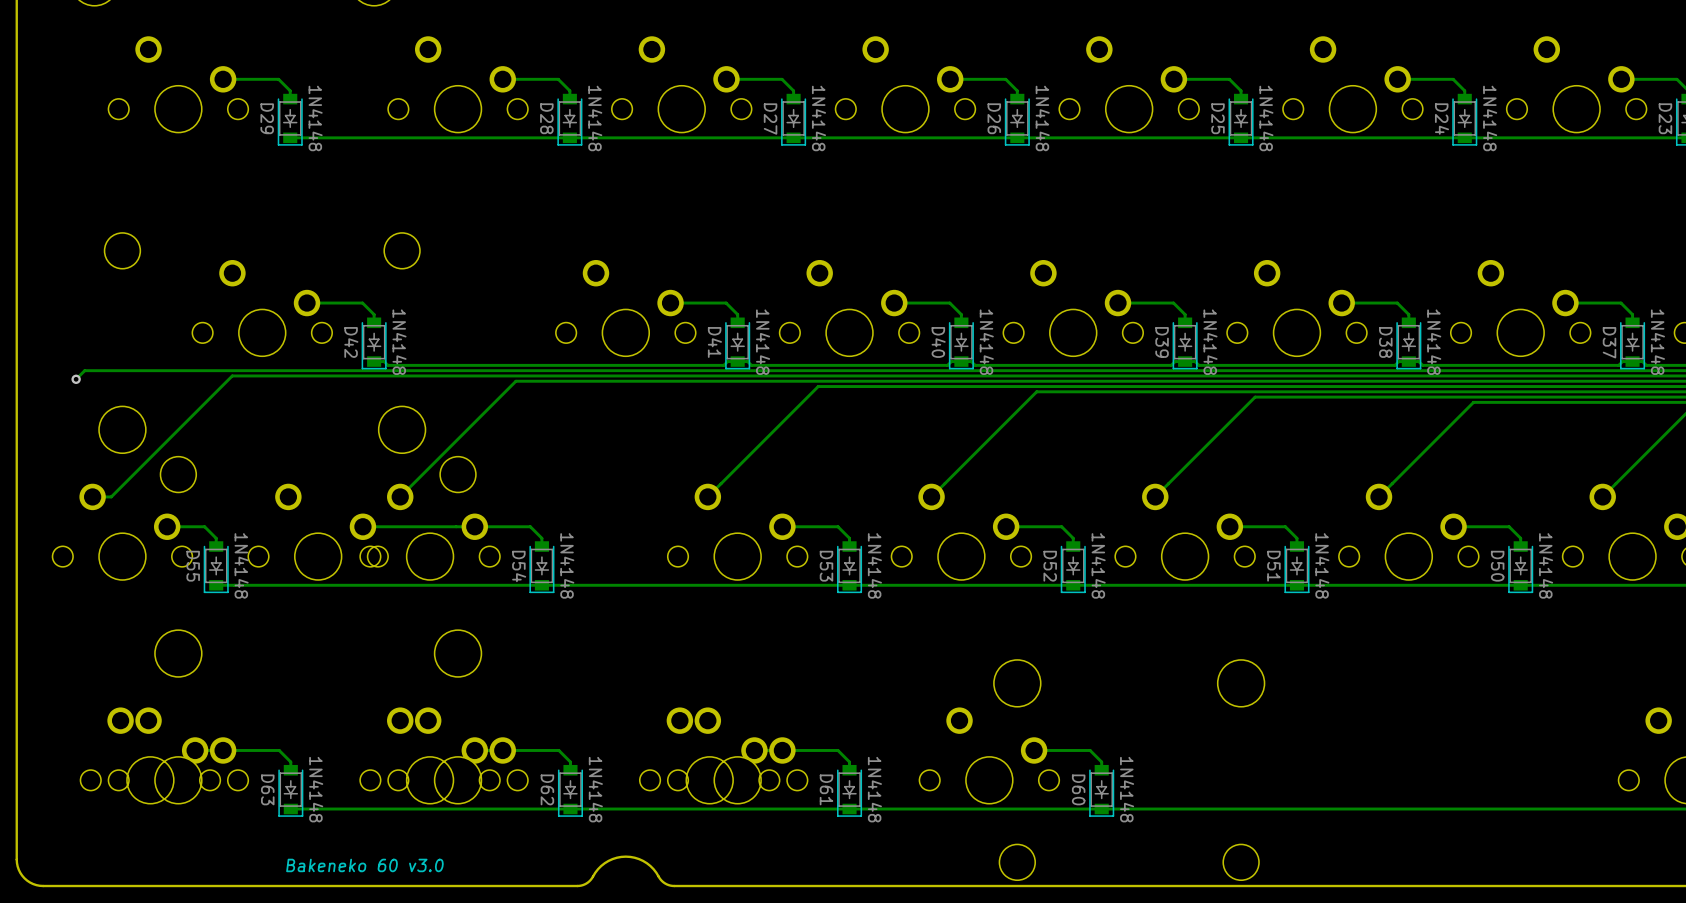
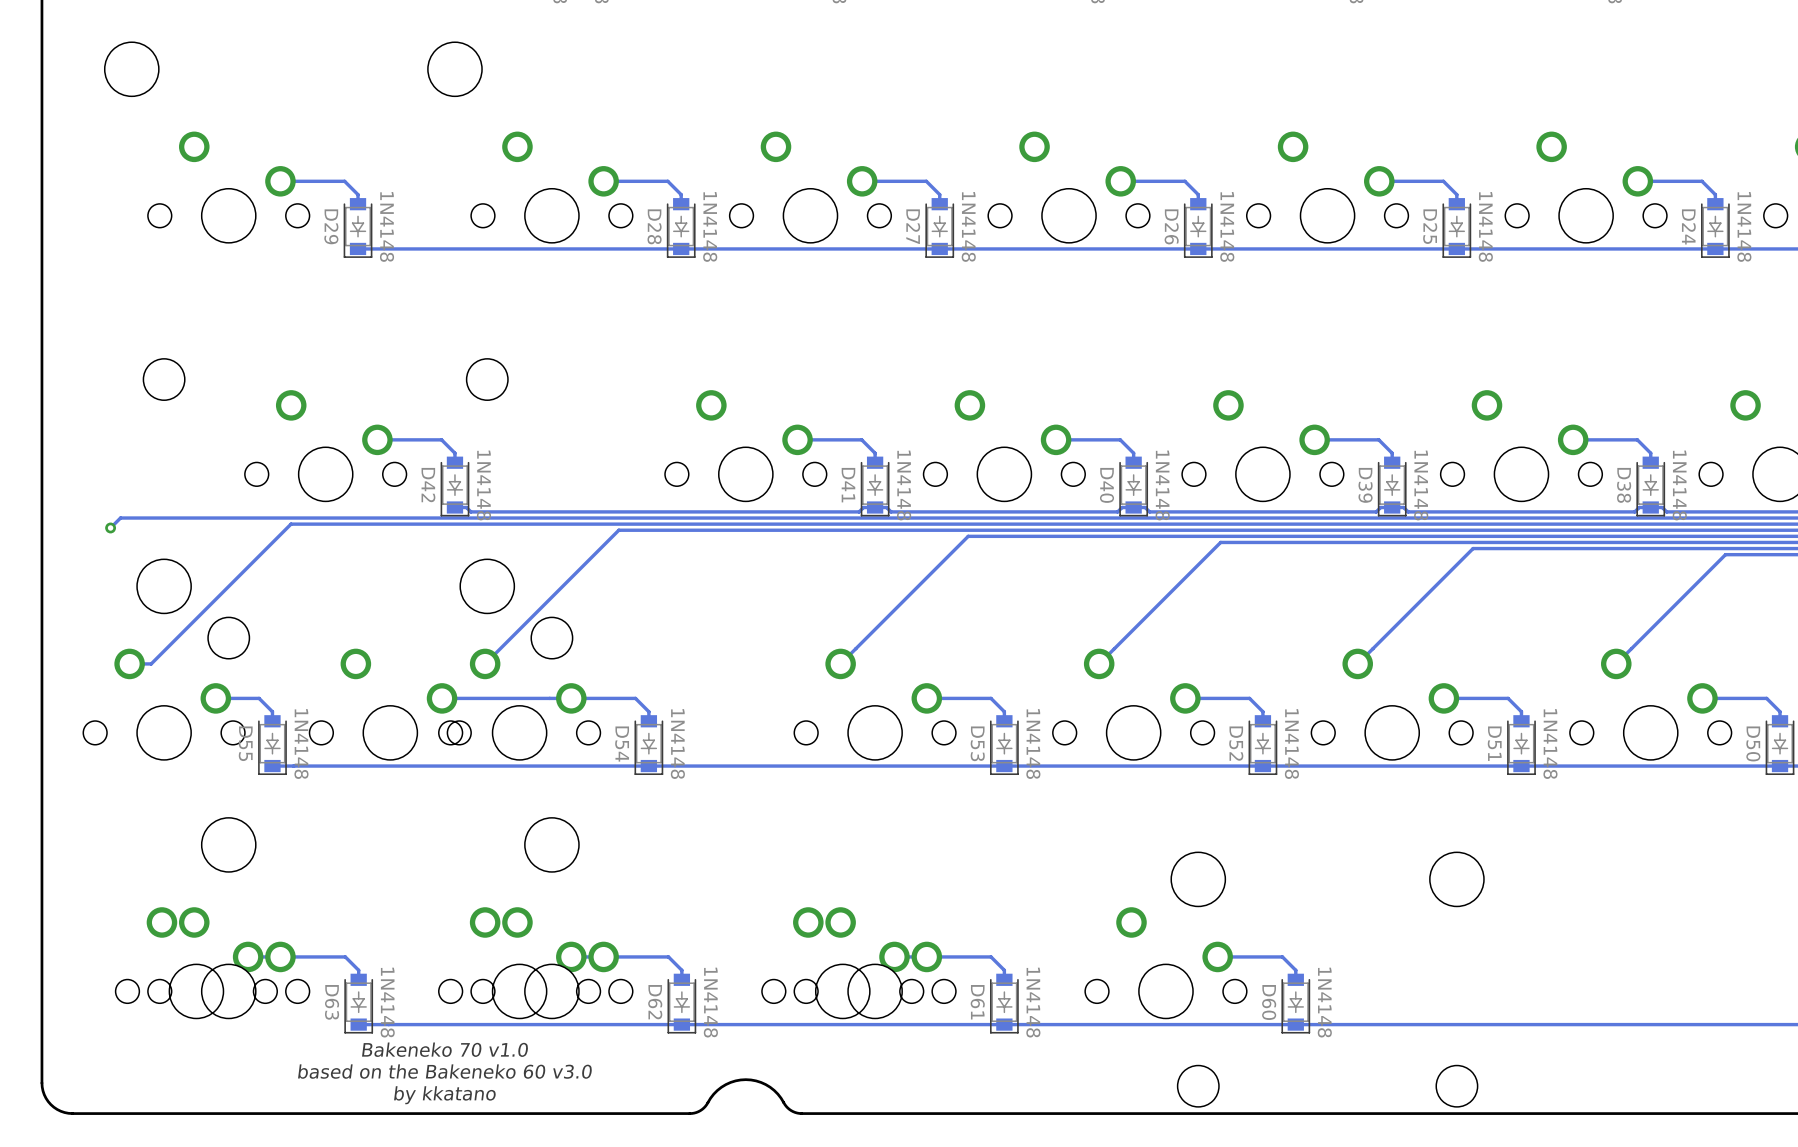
text: none -> Bakeneko 70 v1.0 (445, 1049)
text: none -> based on the Bakeneko 60 v3.0 (445, 1071)
text: Bakeneko 60 v3.0 (364, 865) -> by kkatano (445, 1095)

